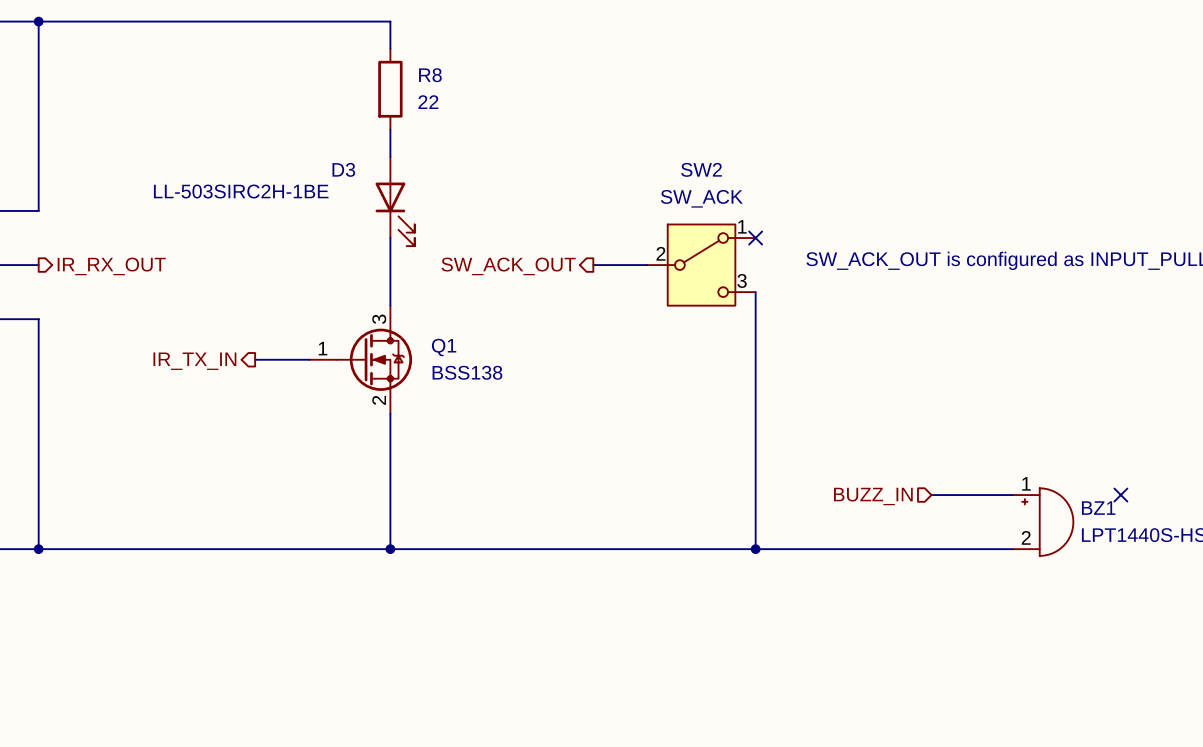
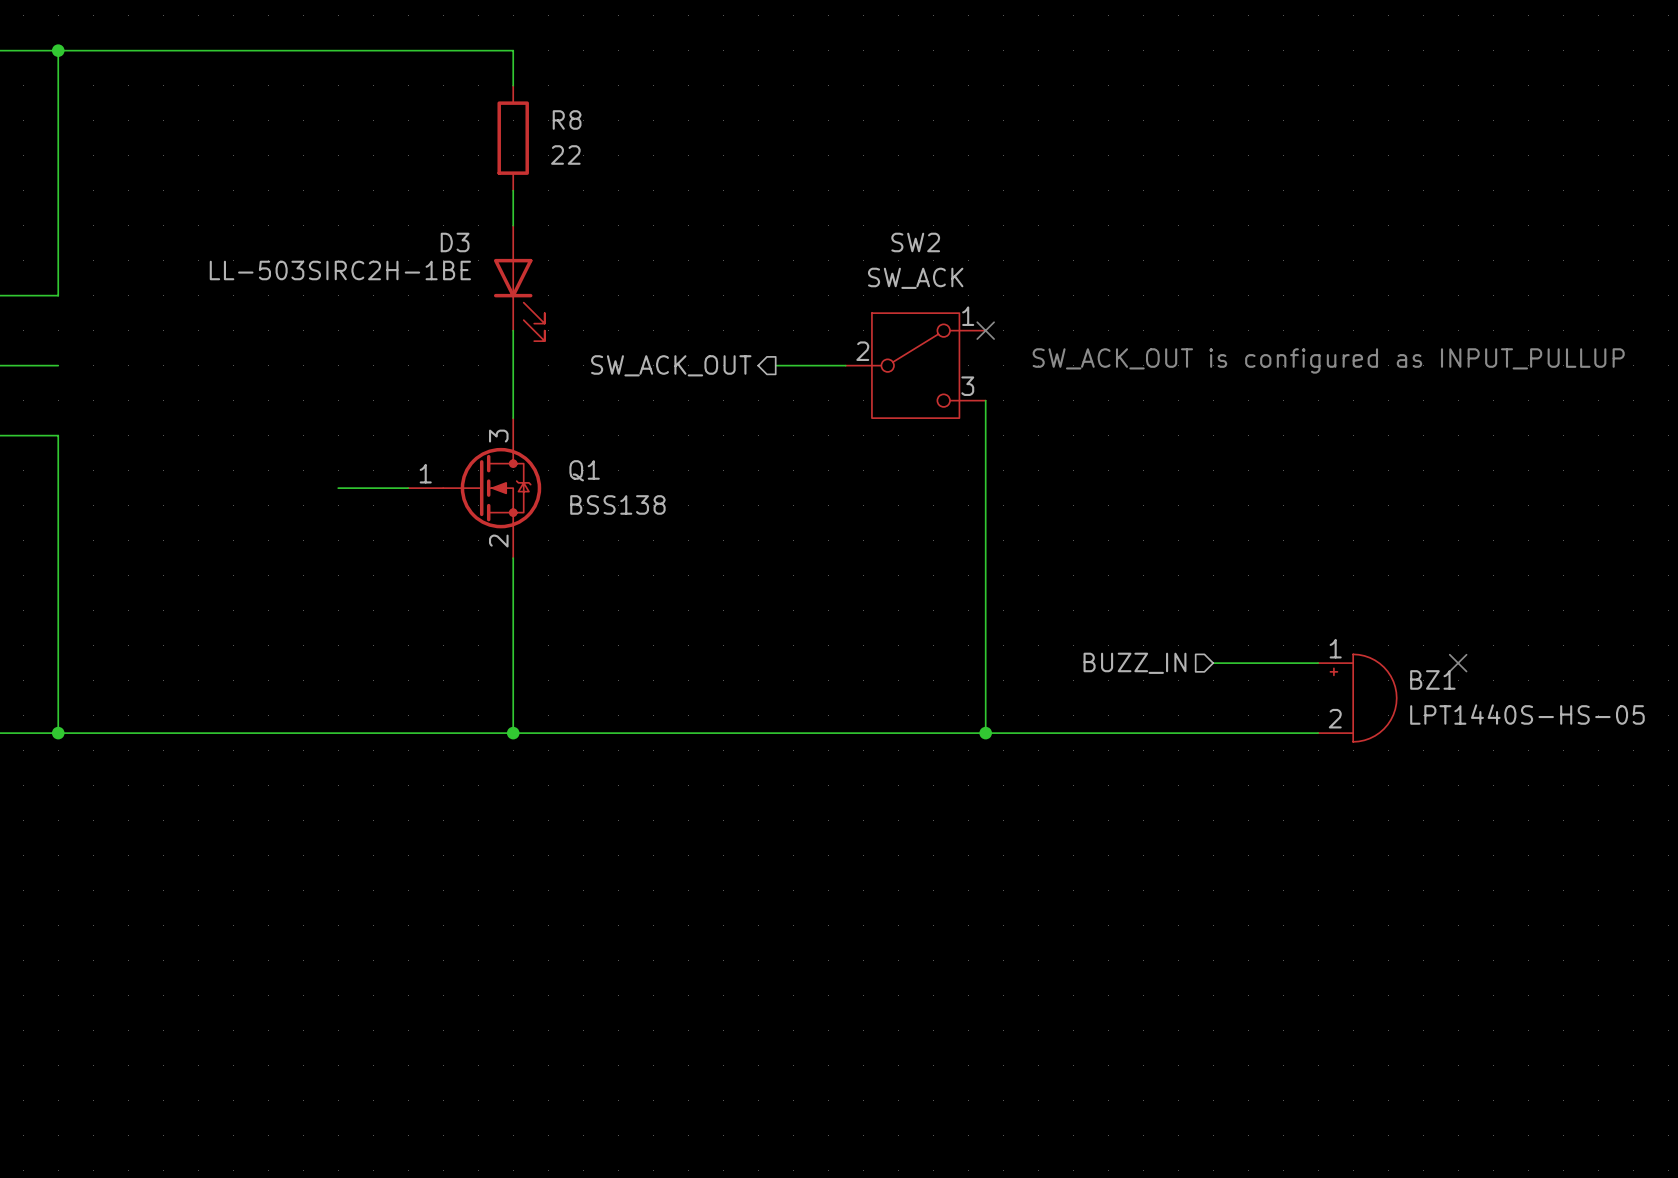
hierarchical label: IR_RX_OUT (111, 266) -> none
hierarchical label: IR_TX_IN (194, 361) -> none

